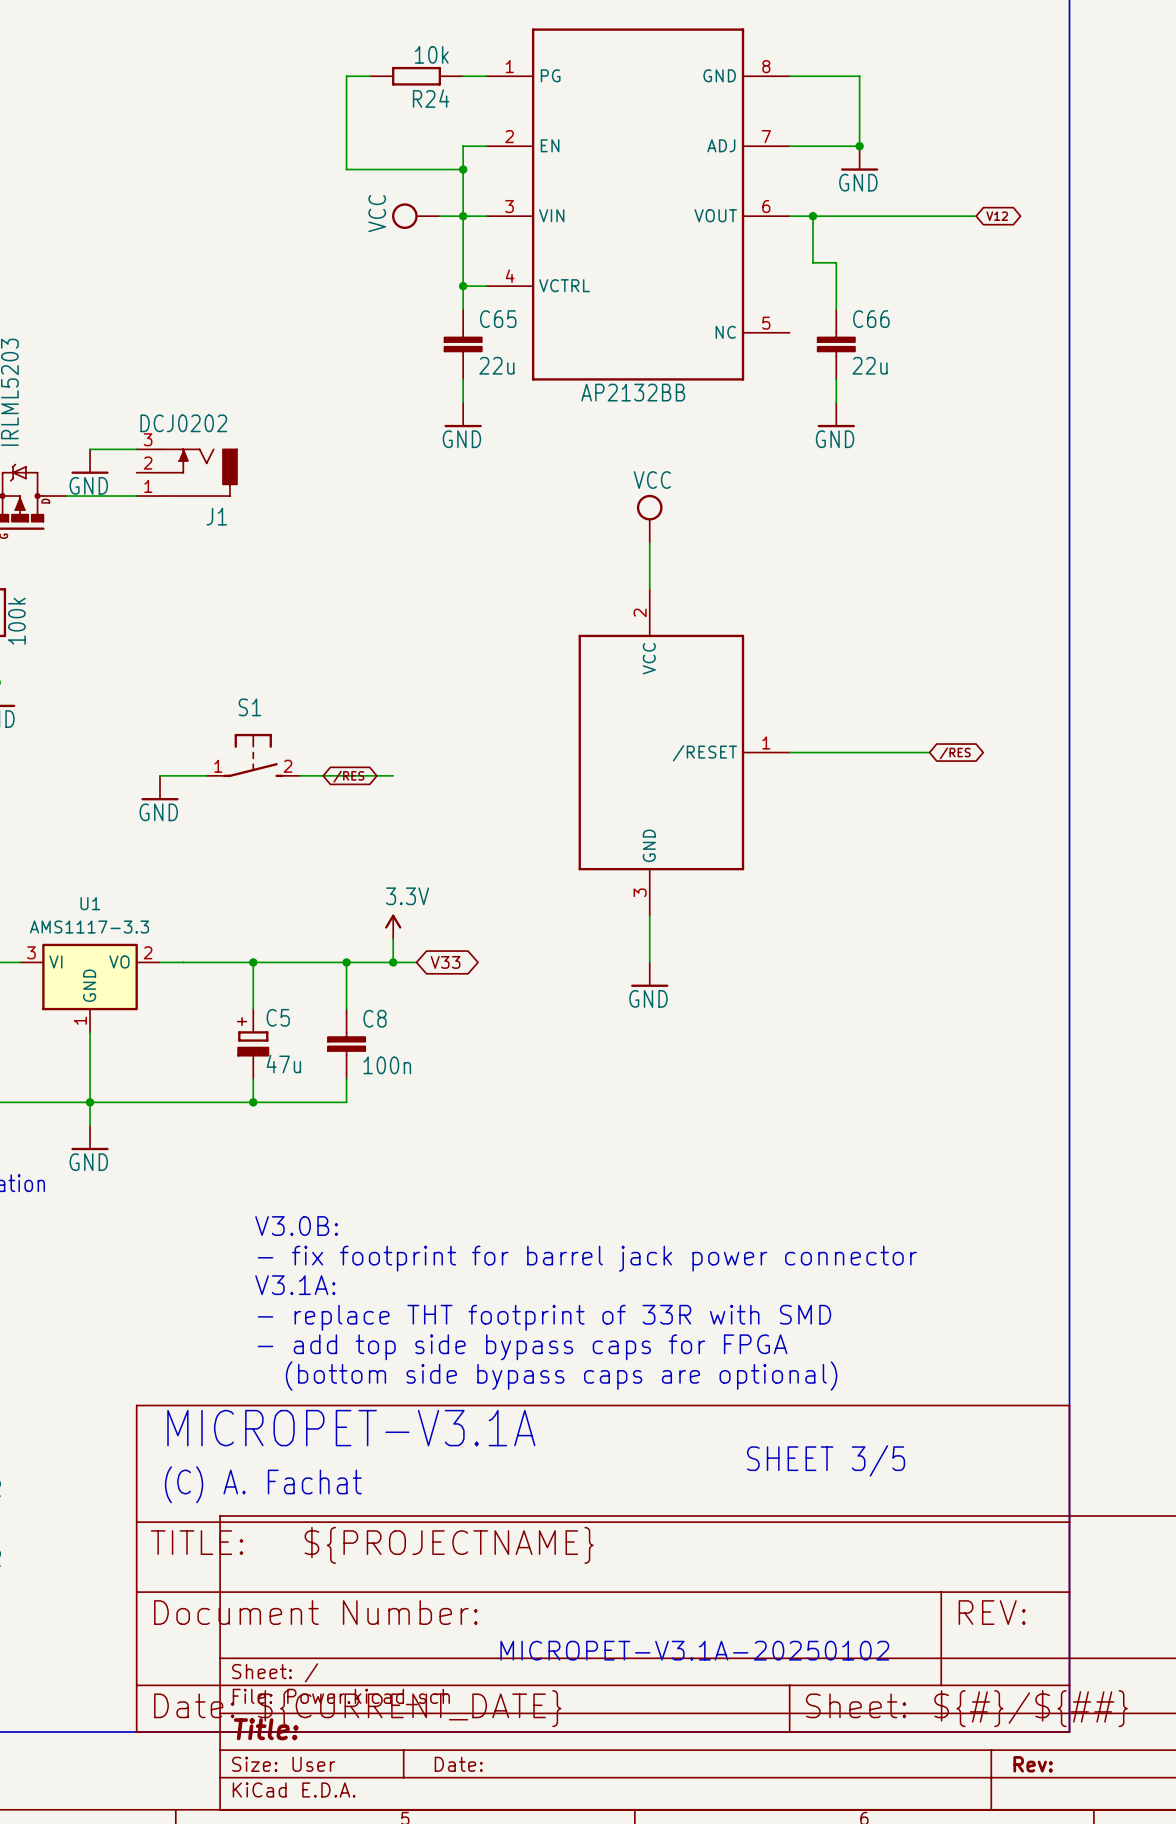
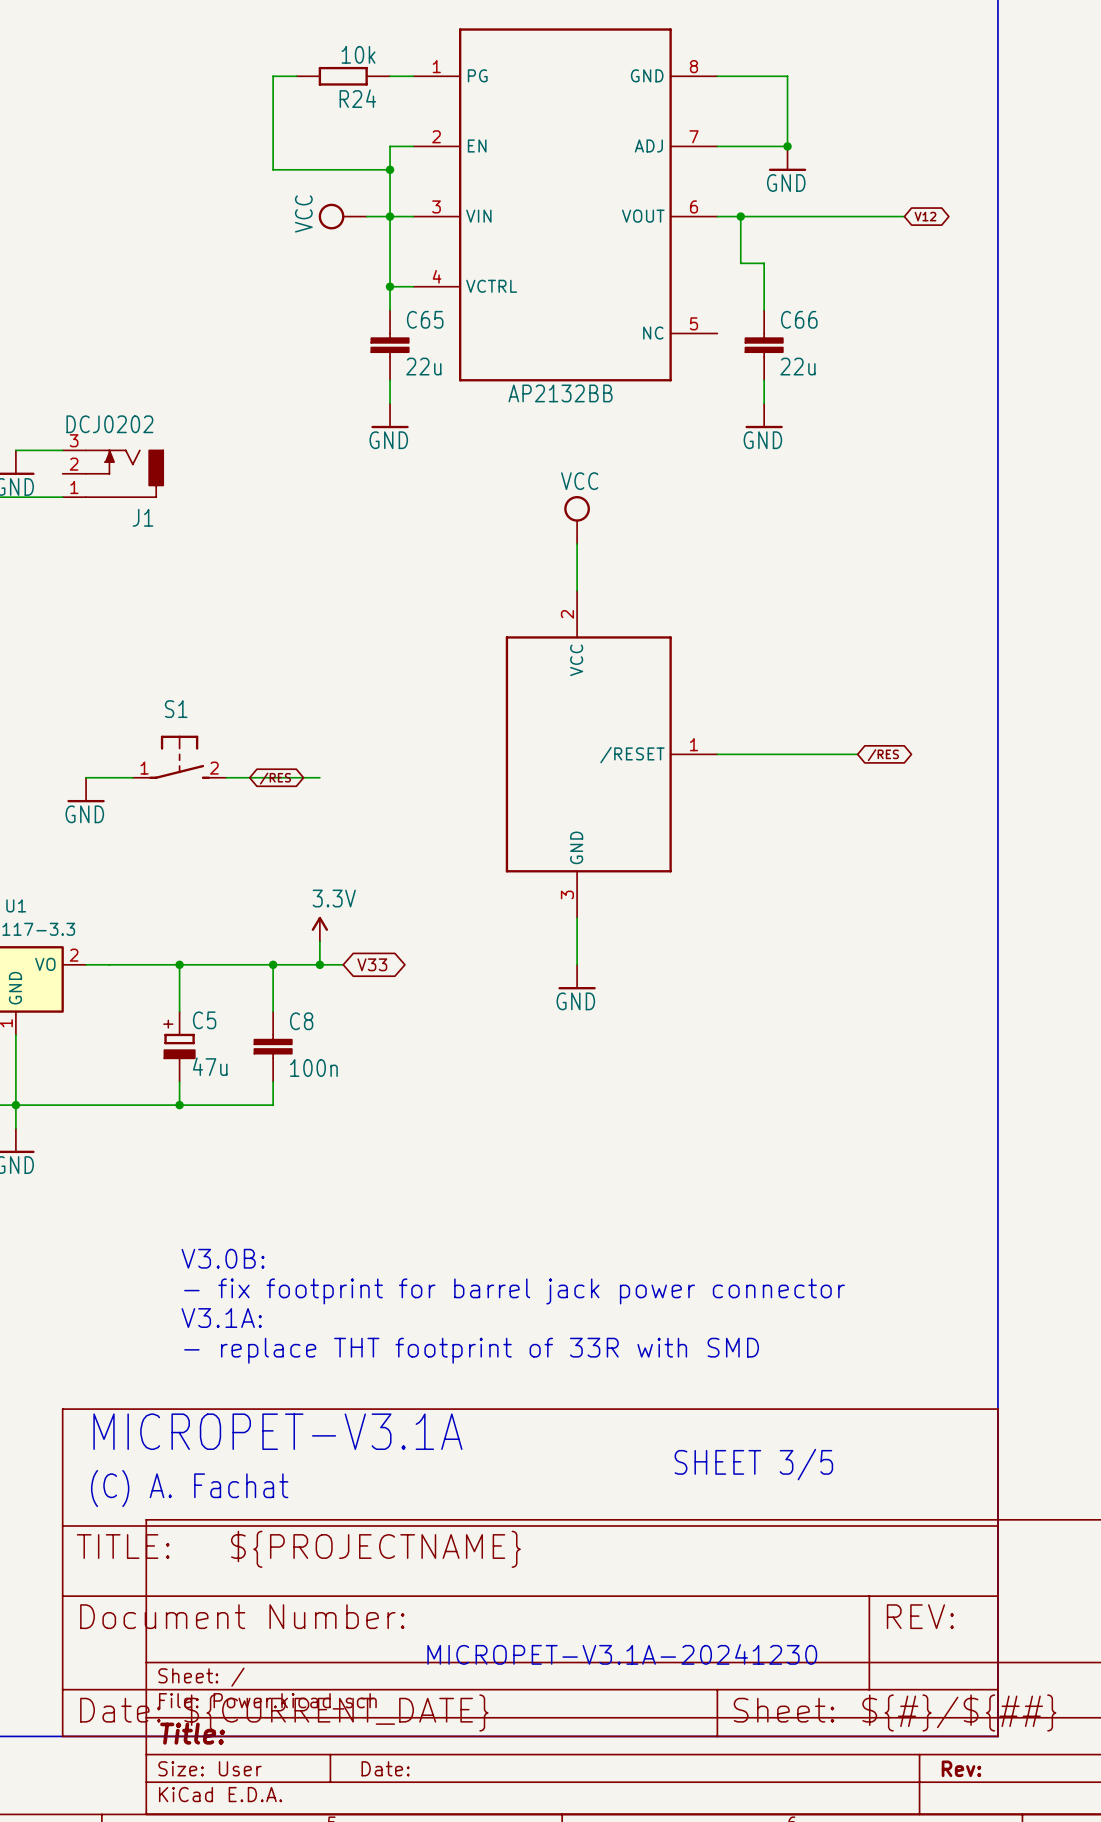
text: V3.0B: (296, 1226) -> none
text: - fix footprint for barrel jack power connector (587, 1258) -> V3.0B: (223, 1258)
text: V3.1A: (295, 1285) -> - fix footprint for barrel jack power connector (514, 1291)
text: - replace THT footprint of 33R with SMD (544, 1317) -> V3.1A: (221, 1318)
text: - add top side bypass caps for FPGA (522, 1347) -> - replace THT footprint of 33R with SMD (471, 1350)
text: (bottom side bypass caps are optional) (561, 1376) -> none
text: MICROPET-V3.1A-20250102 (694, 1650) -> MICROPET-V3.1A-20241230 (622, 1654)

